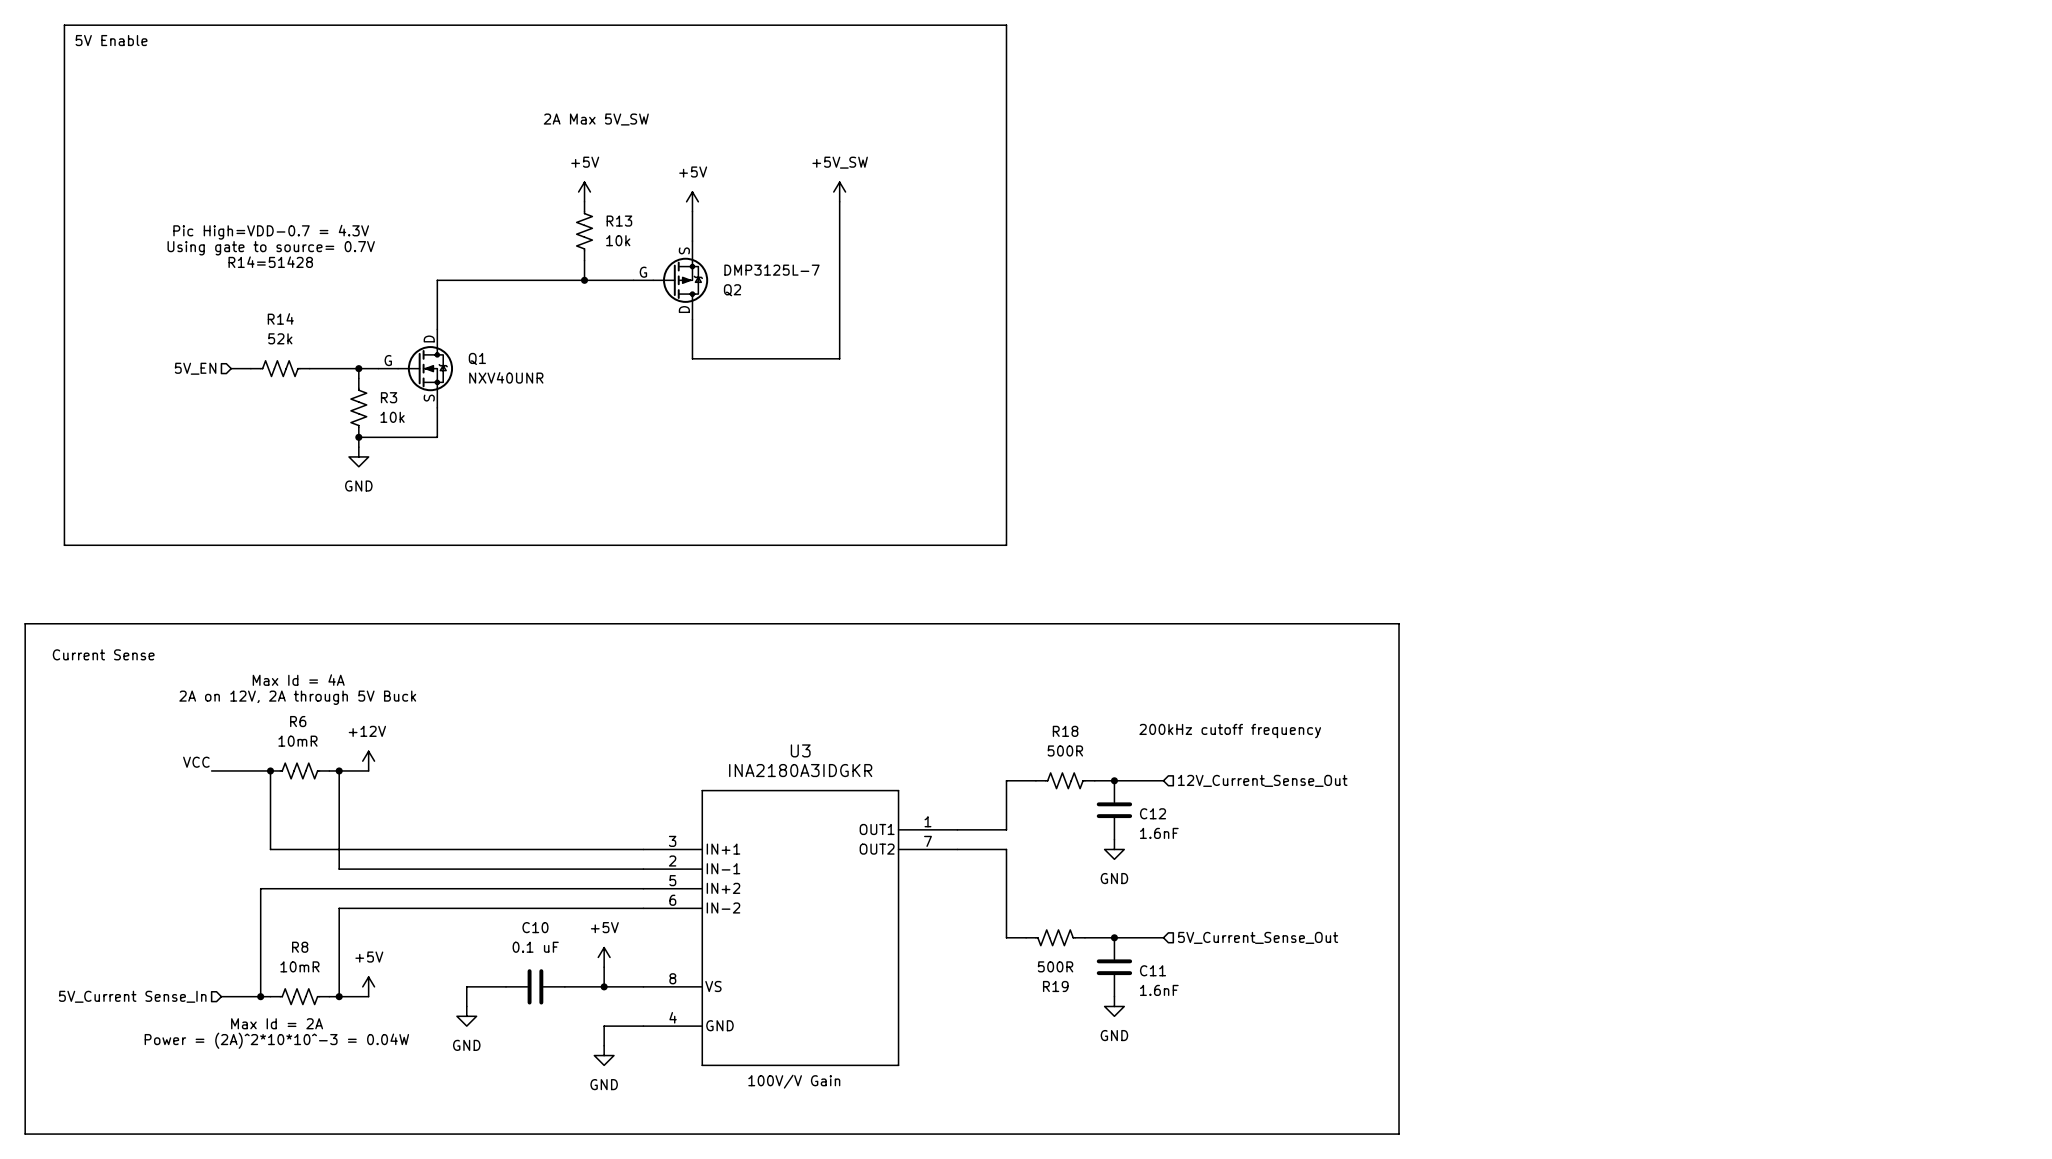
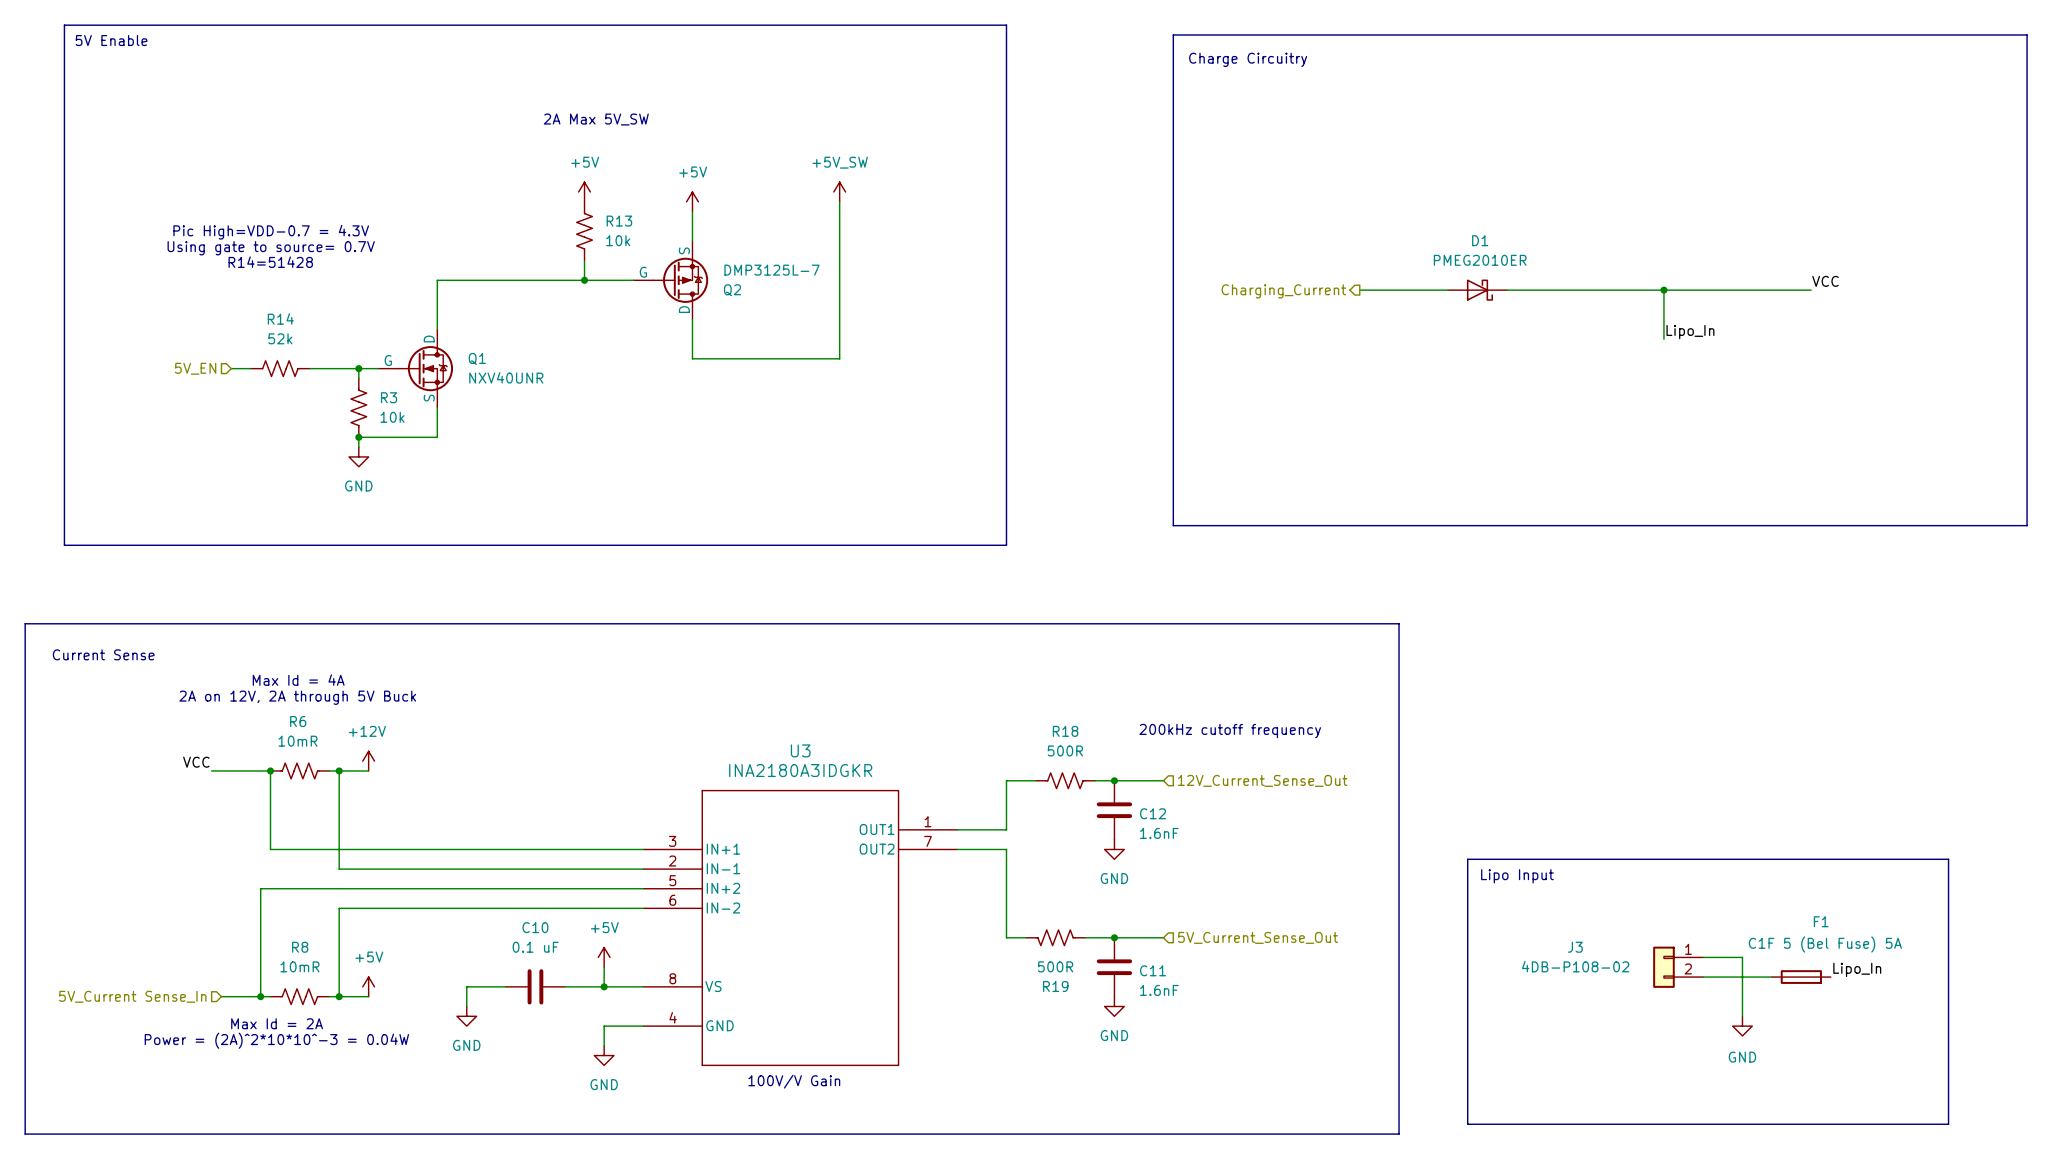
line: none -> (1173, 34) (2027, 34) (2027, 525) (1173, 525) (1173, 34)
text: none -> Charge Circuitry (1248, 59)
label: none -> VCC (1825, 281)
wire: none -> (1359, 290) (1448, 290)
D1: none -> PMEG2010ER (1477, 290)
wire: none -> (1506, 290) (1811, 290)
wire: none -> (1663, 290) (1663, 339)
junction: none -> (1663, 290)
hierarchical label: none -> Charging_Current (1283, 291)
label: none -> Lipo_In (1690, 332)
line: none -> (1467, 859) (1948, 859) (1948, 1124) (1467, 1124) (1467, 859)
text: none -> Lipo Input (1517, 876)
wire: none -> (1703, 957) (1742, 957) (1742, 1016)
J3: none -> 4DB-P108-02 (1678, 967)
label: none -> Lipo_In (1857, 969)
wire: none -> (1703, 977) (1771, 977)
F1: none -> C1F 5 (Bel Fuse) 5A (1801, 977)
power symbol: none -> GND (1742, 1026)

